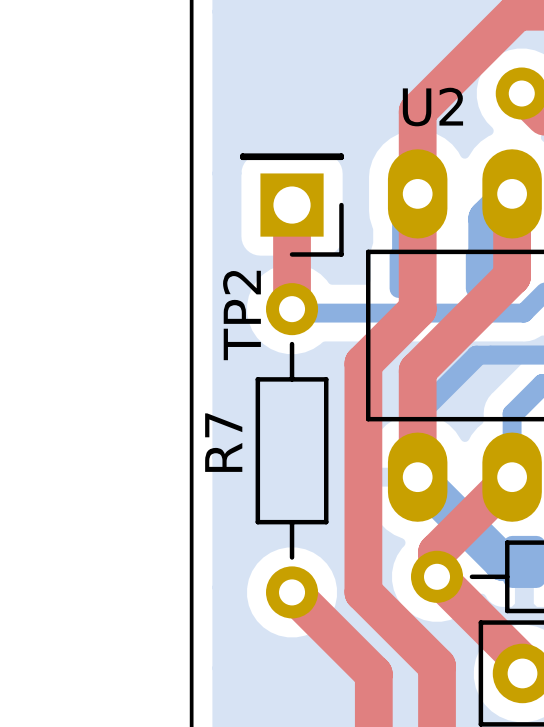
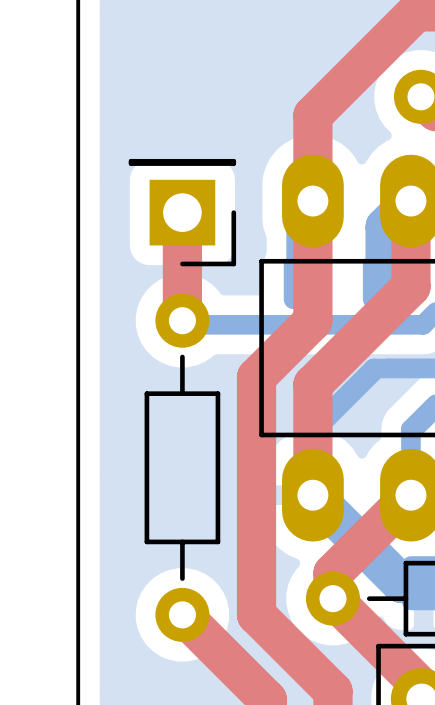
U2 name: U2 (432, 107) -> none
TP2 name: TP2 (241, 315) -> none
R7 name: R7 (223, 442) -> none

